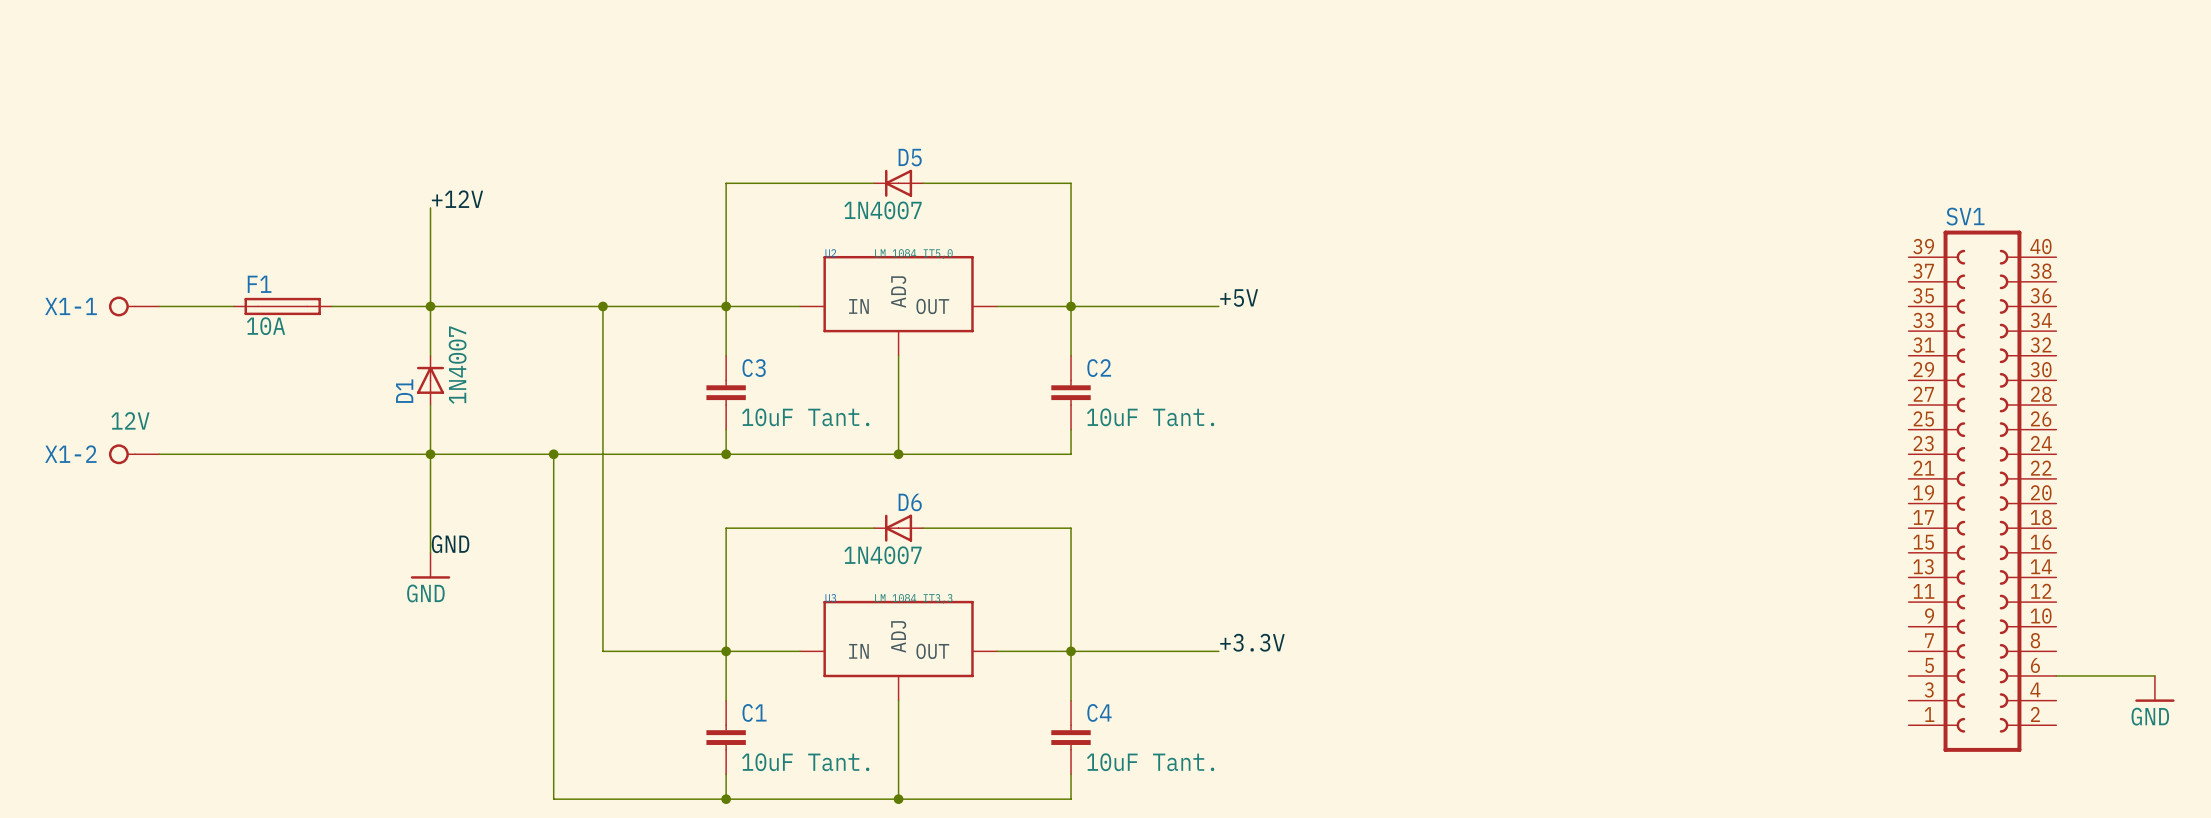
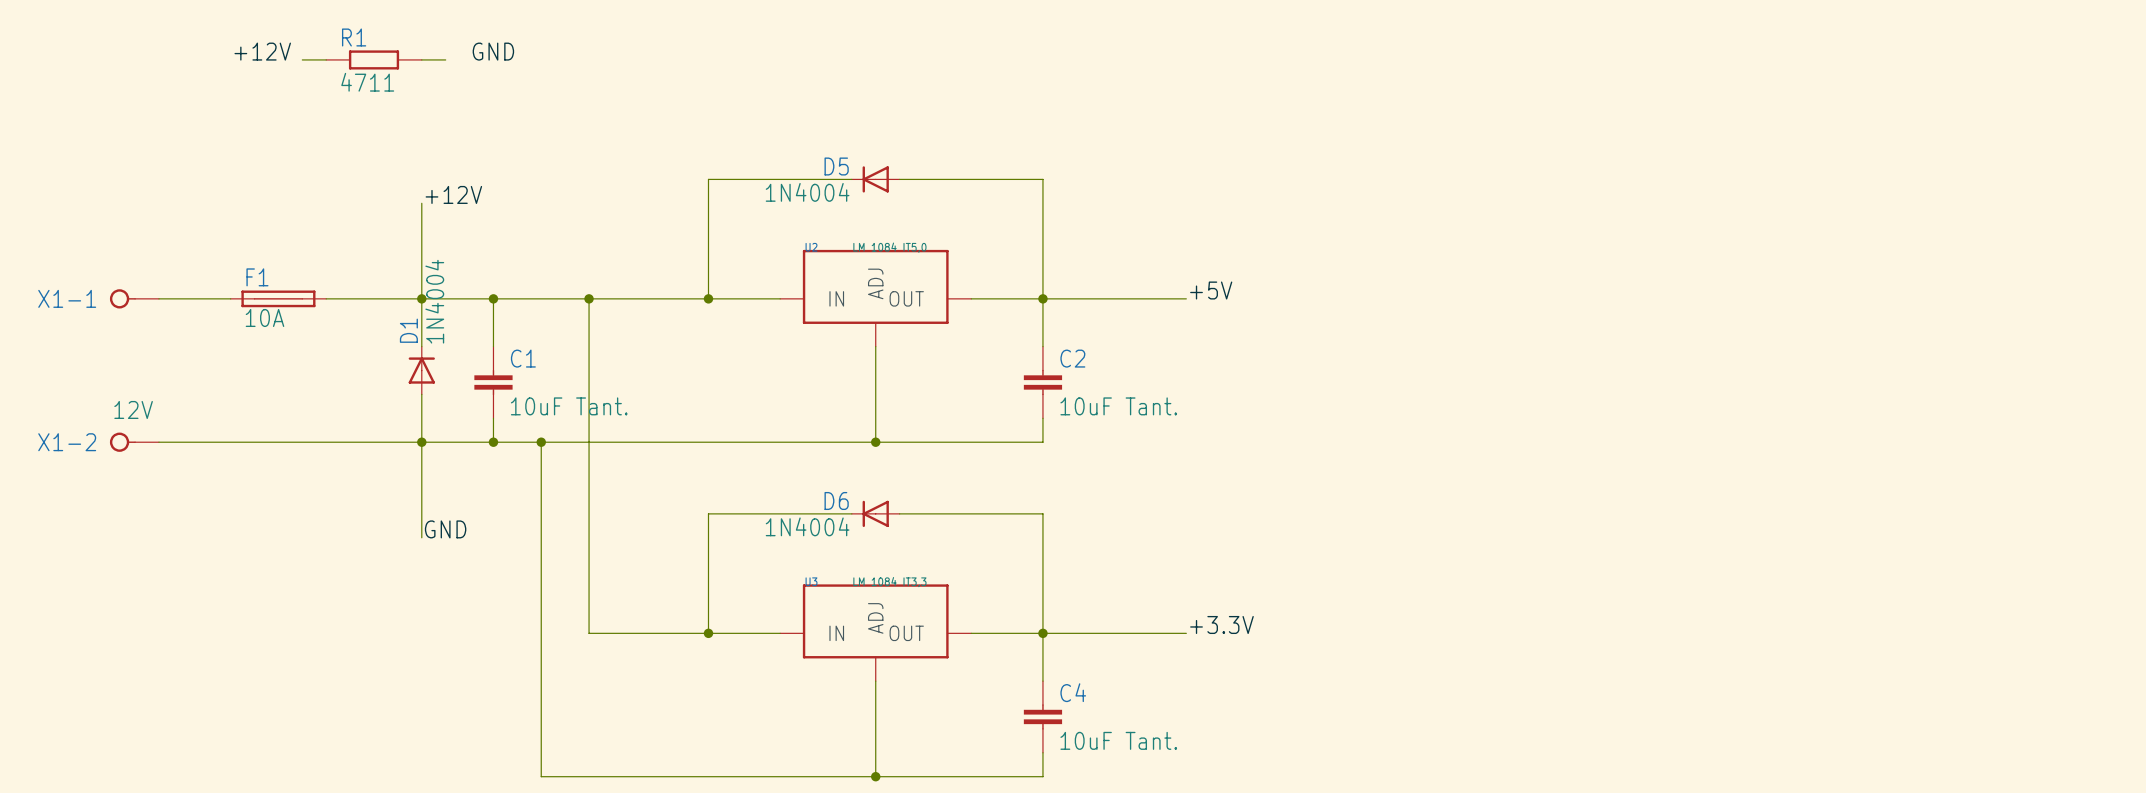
label: none -> +12V (262, 51)
label: none -> GND (493, 51)
wire: none -> (302, 59) (326, 59)
R1: none -> 4711 (374, 59)
wire: none -> (421, 59) (445, 59)
D5 name position: D5 (910, 157) -> D5 (836, 166)
D5 value: 1N4007 (883, 210) -> 1N4004 (807, 192)
junction: none -> (493, 298)
wire: (726, 306) (726, 355) -> (493, 298) (493, 346)
D1 value: 1N4007 (457, 365) -> 1N4004 (434, 301)
D1 name position: D1 (404, 391) -> D1 (408, 330)
C3: 10uF Tant. (726, 392) -> none
wire: (726, 429) (726, 454) -> (493, 418) (493, 442)
junction: none -> (493, 442)
junction: (726, 454) -> none
SV1: (1982, 491) -> none
D6 name position: D6 (910, 502) -> D6 (836, 500)
D6 value: 1N4007 (883, 555) -> 1N4004 (807, 526)
power symbol: GND (430, 565) -> none
wire: (726, 651) (726, 700) -> none
wire: (2056, 675) (2154, 675) -> none
power symbol: GND (2154, 688) -> none
C1 position: (726, 737) -> (493, 382)
wire: (726, 774) (726, 799) -> none
junction: (726, 799) -> none

